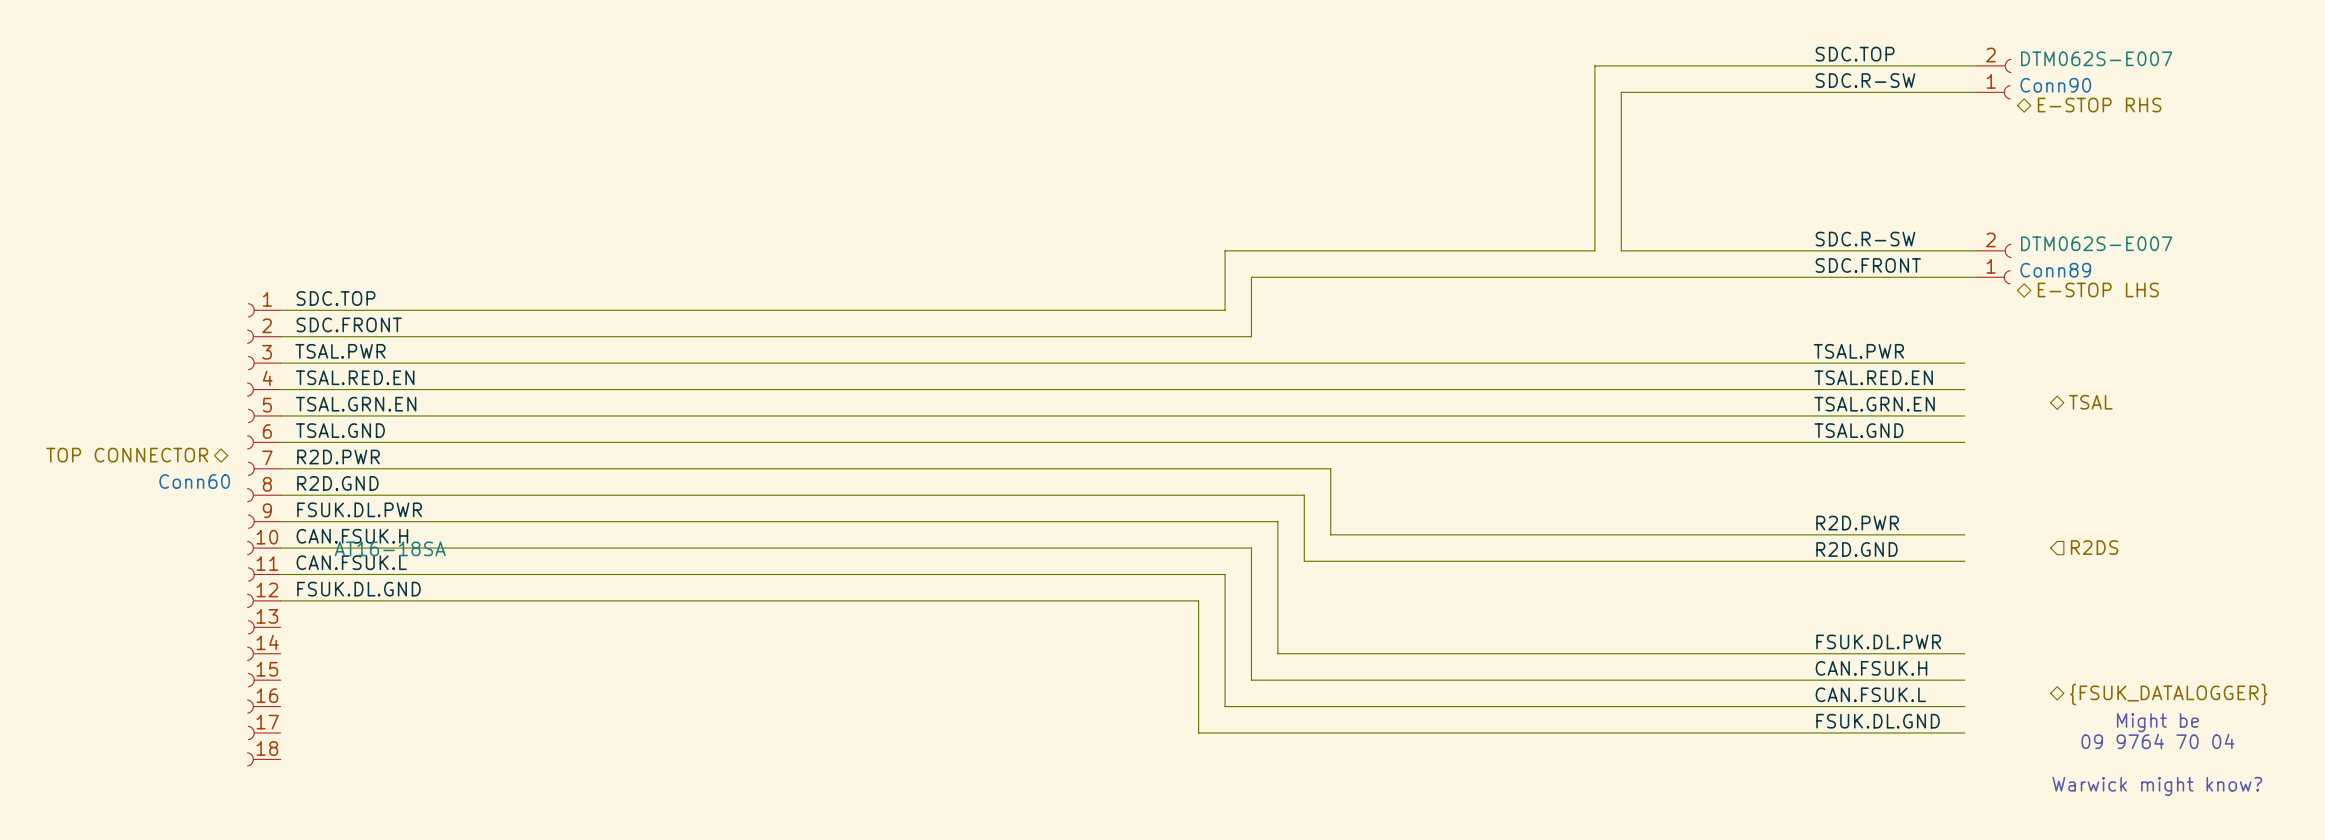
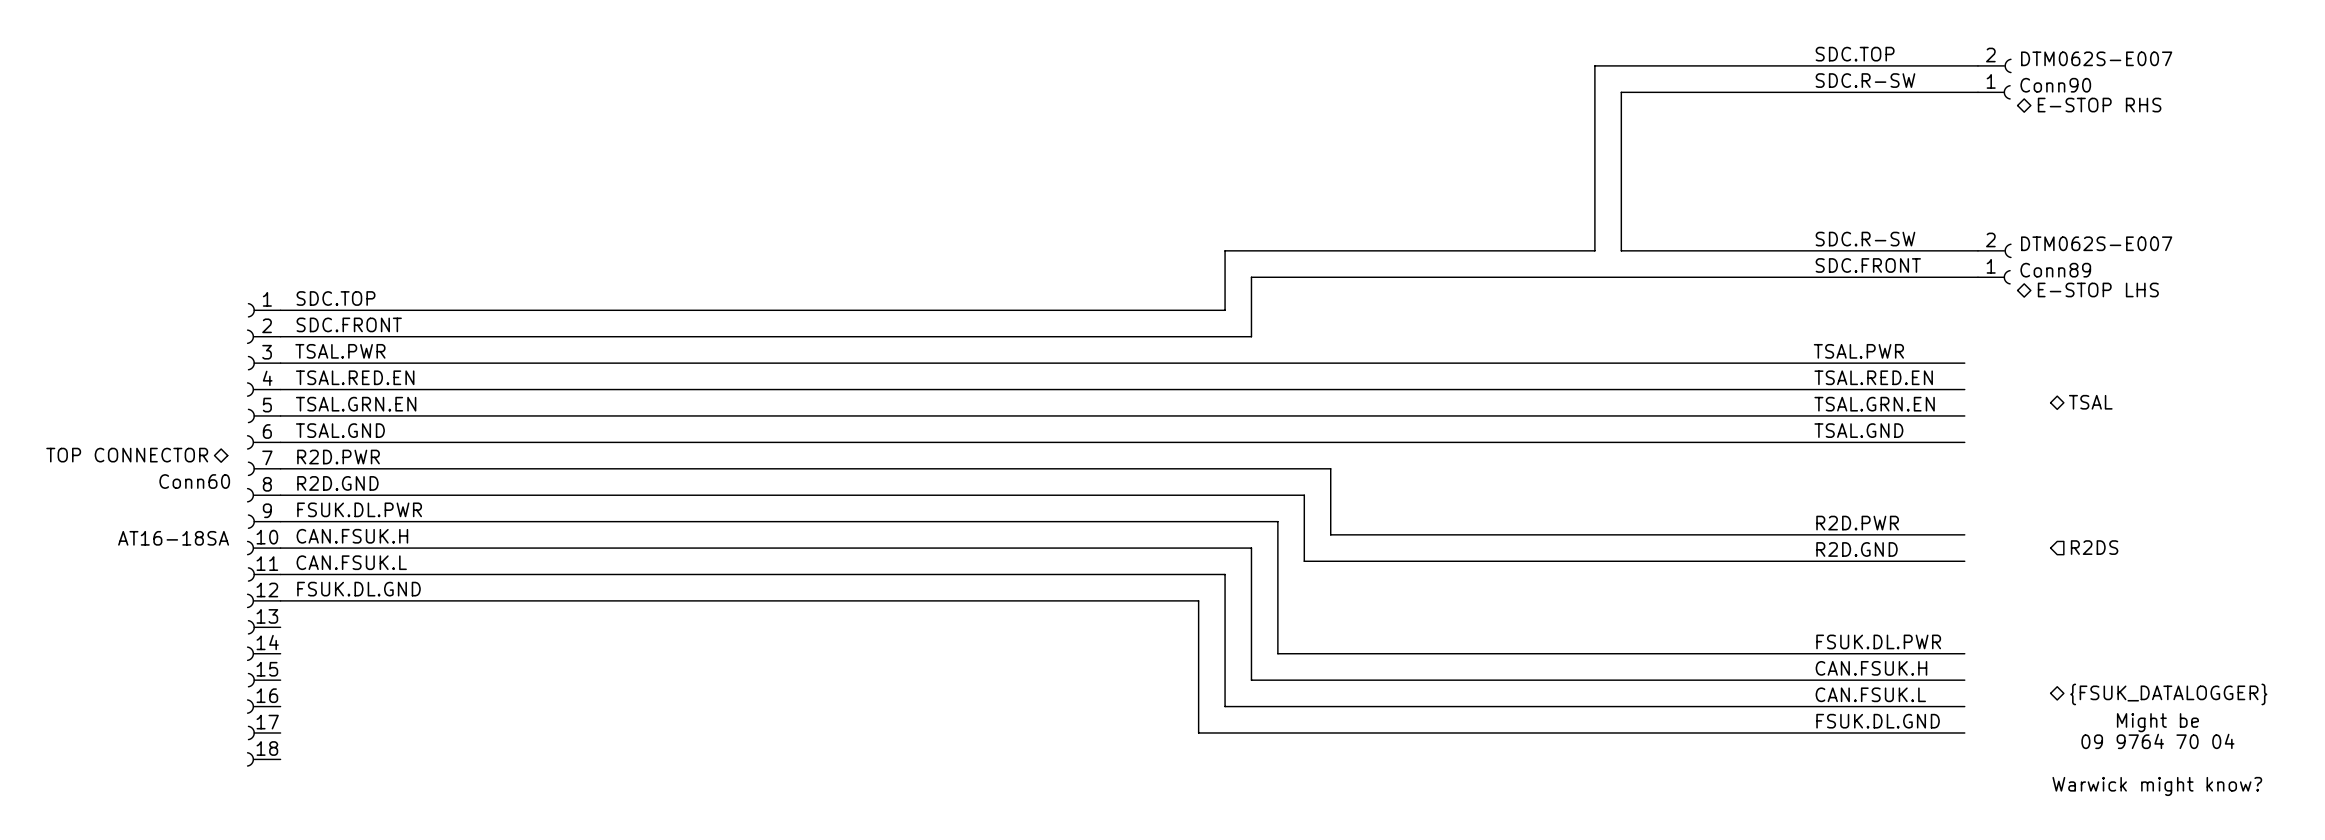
Conn60 text position: AT16-18SA (390, 548) -> AT16-18SA (173, 538)

